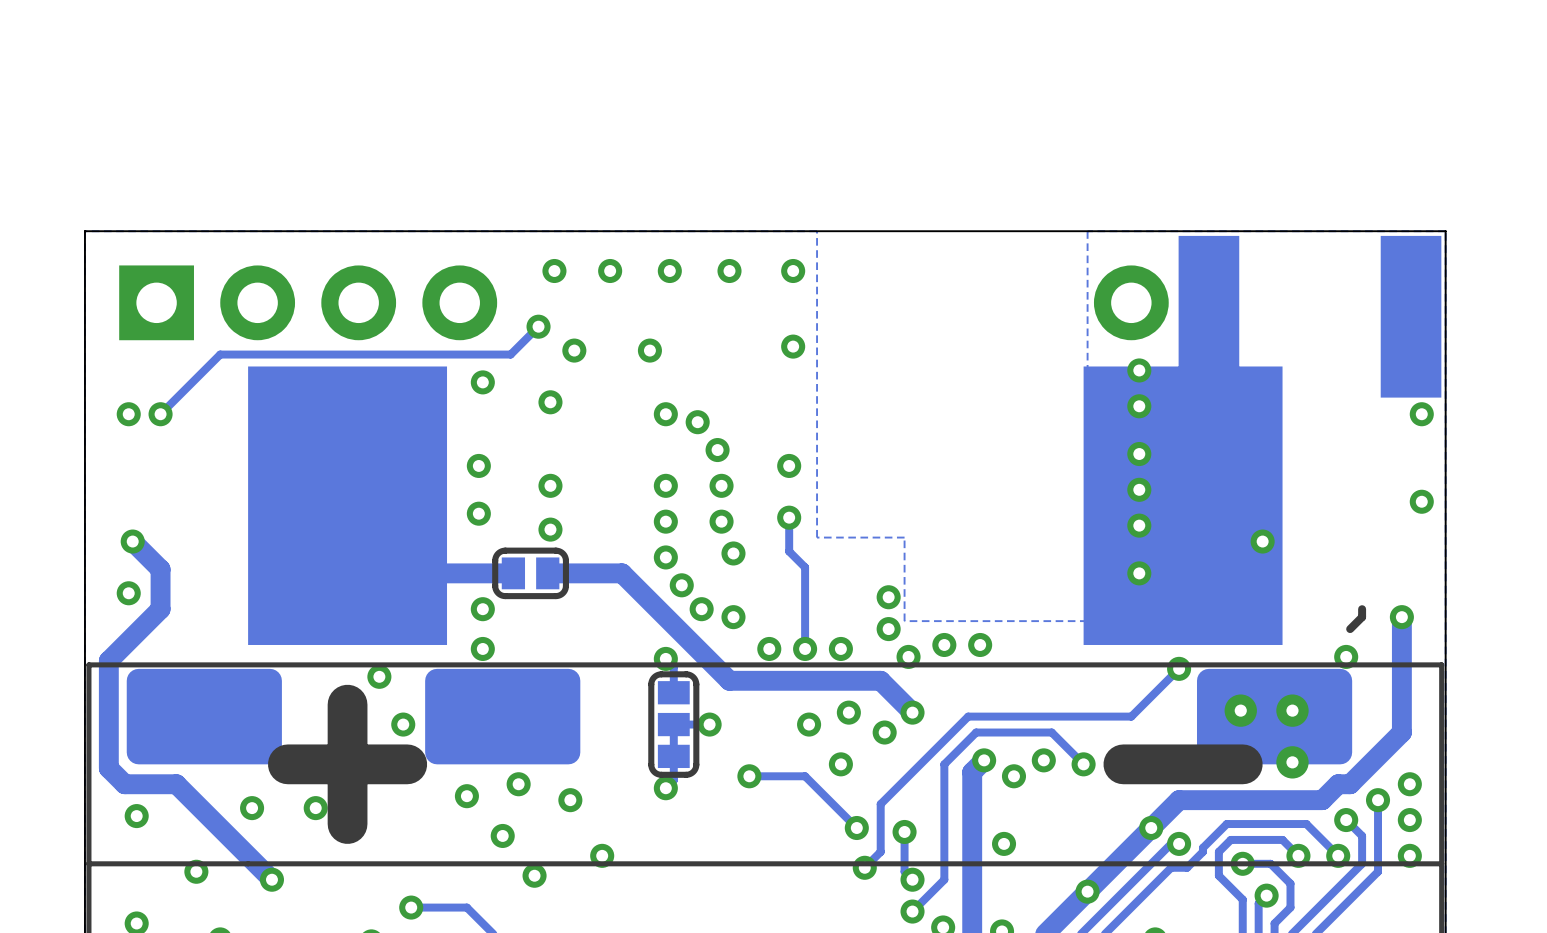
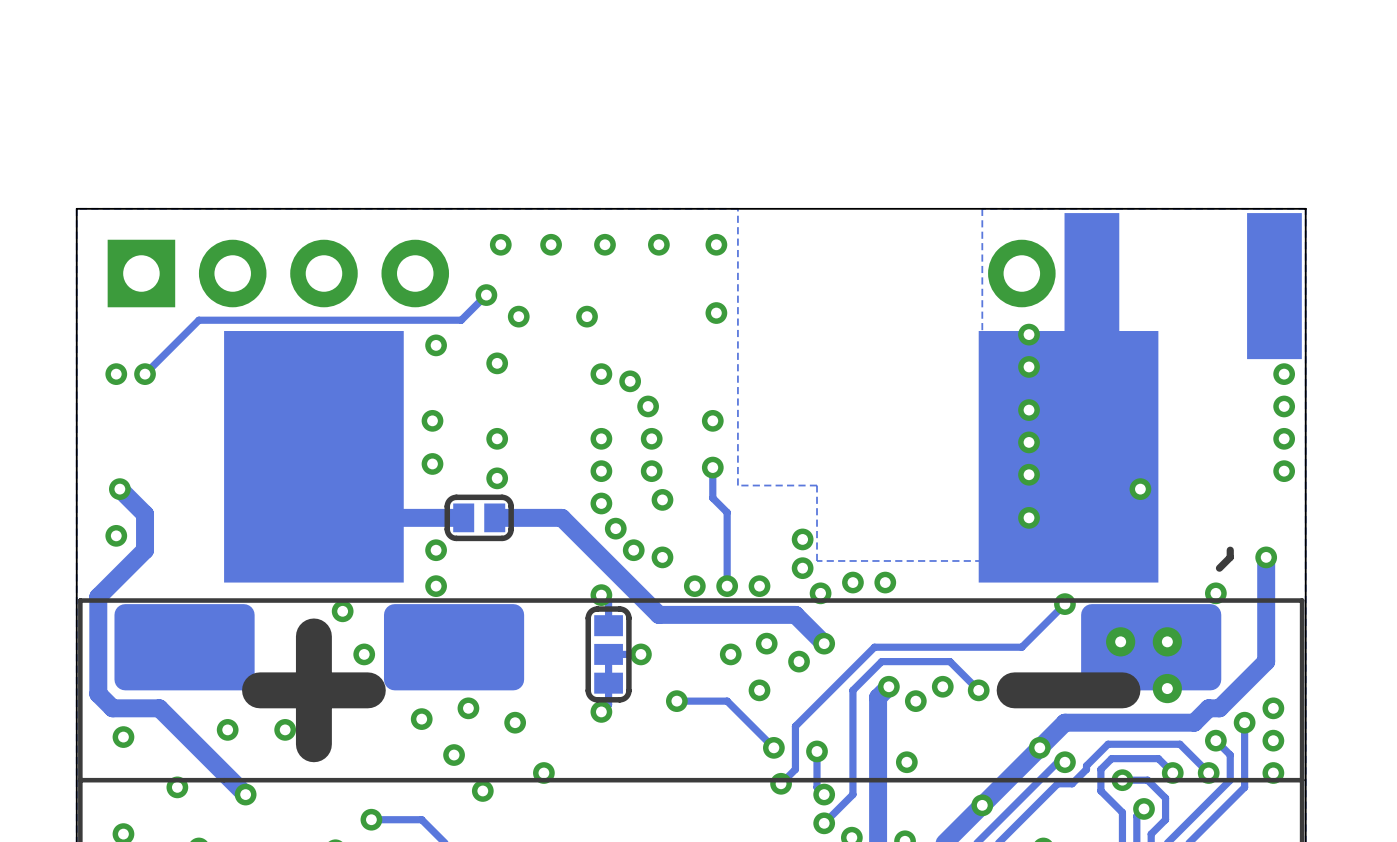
via: none -> (1284, 406)
via: none -> (1284, 438)
via: (1421, 501) -> none
via: none -> (1284, 471)

